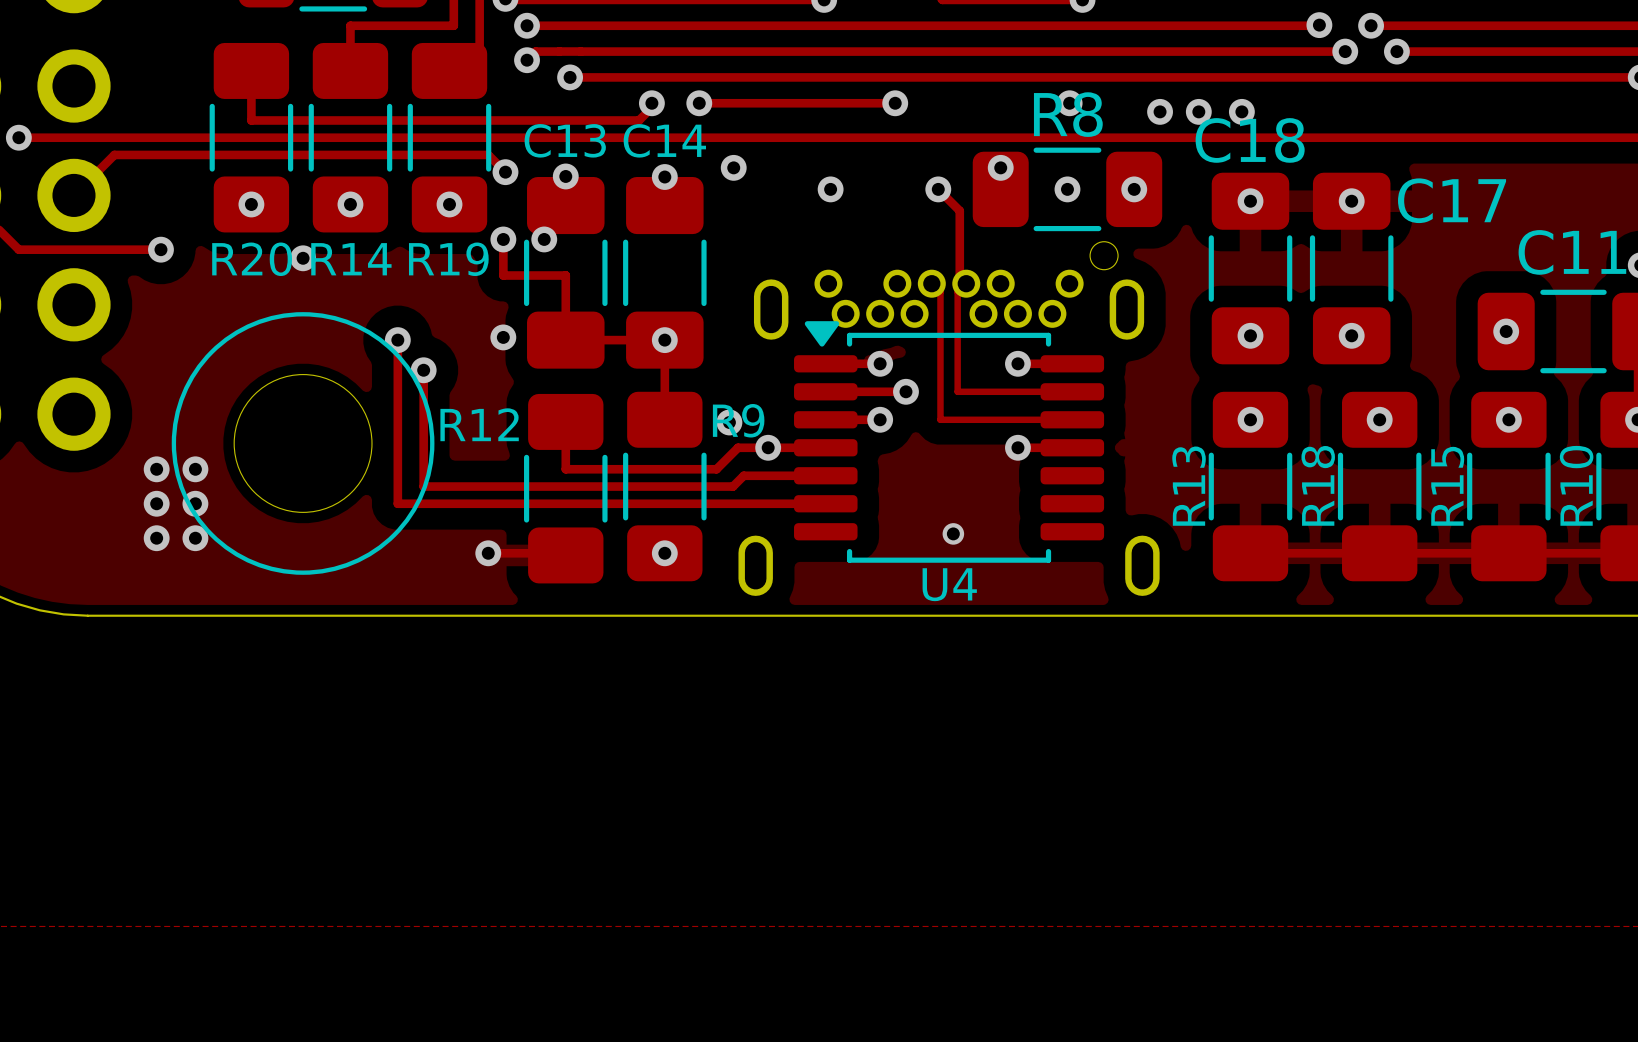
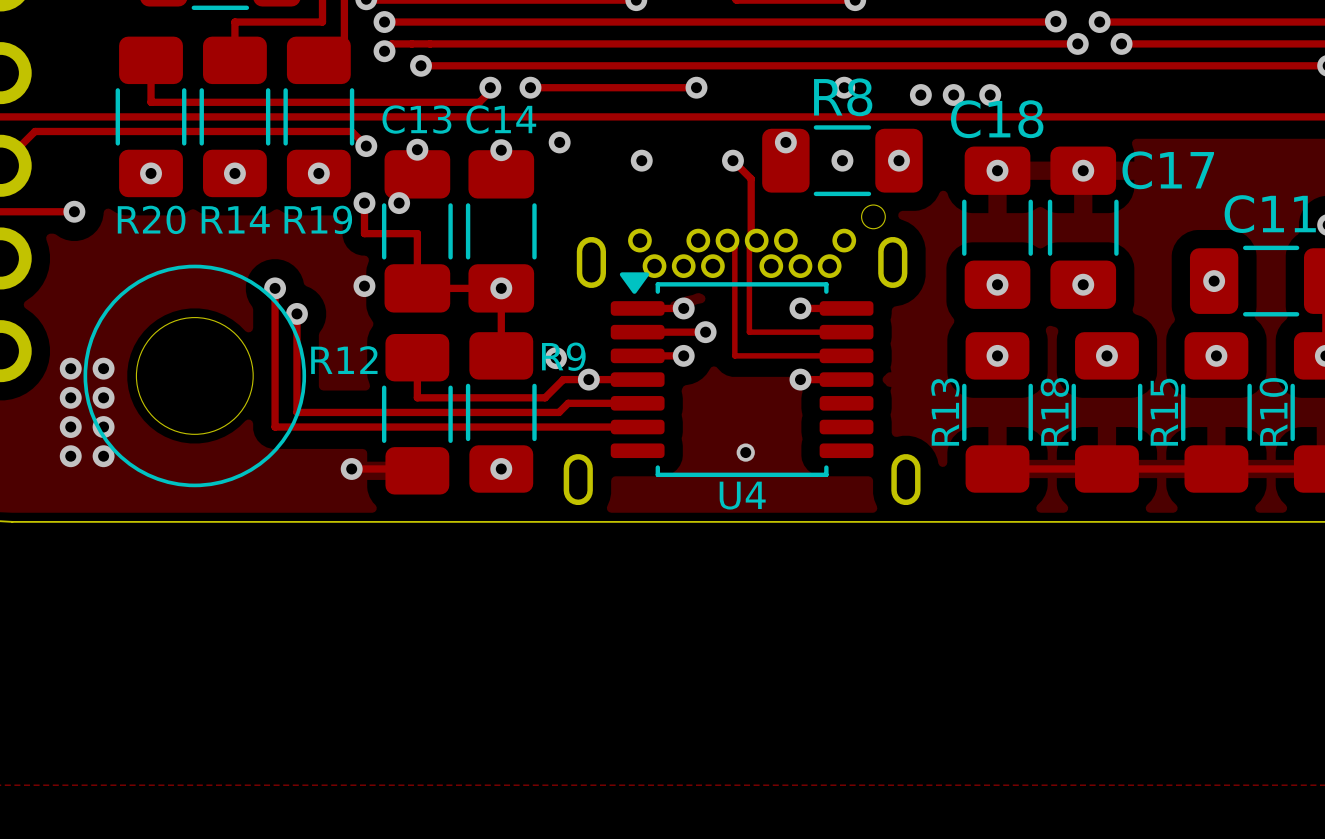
via: (303, 258) -> none
via: none -> (70, 368)
via: none -> (103, 368)

